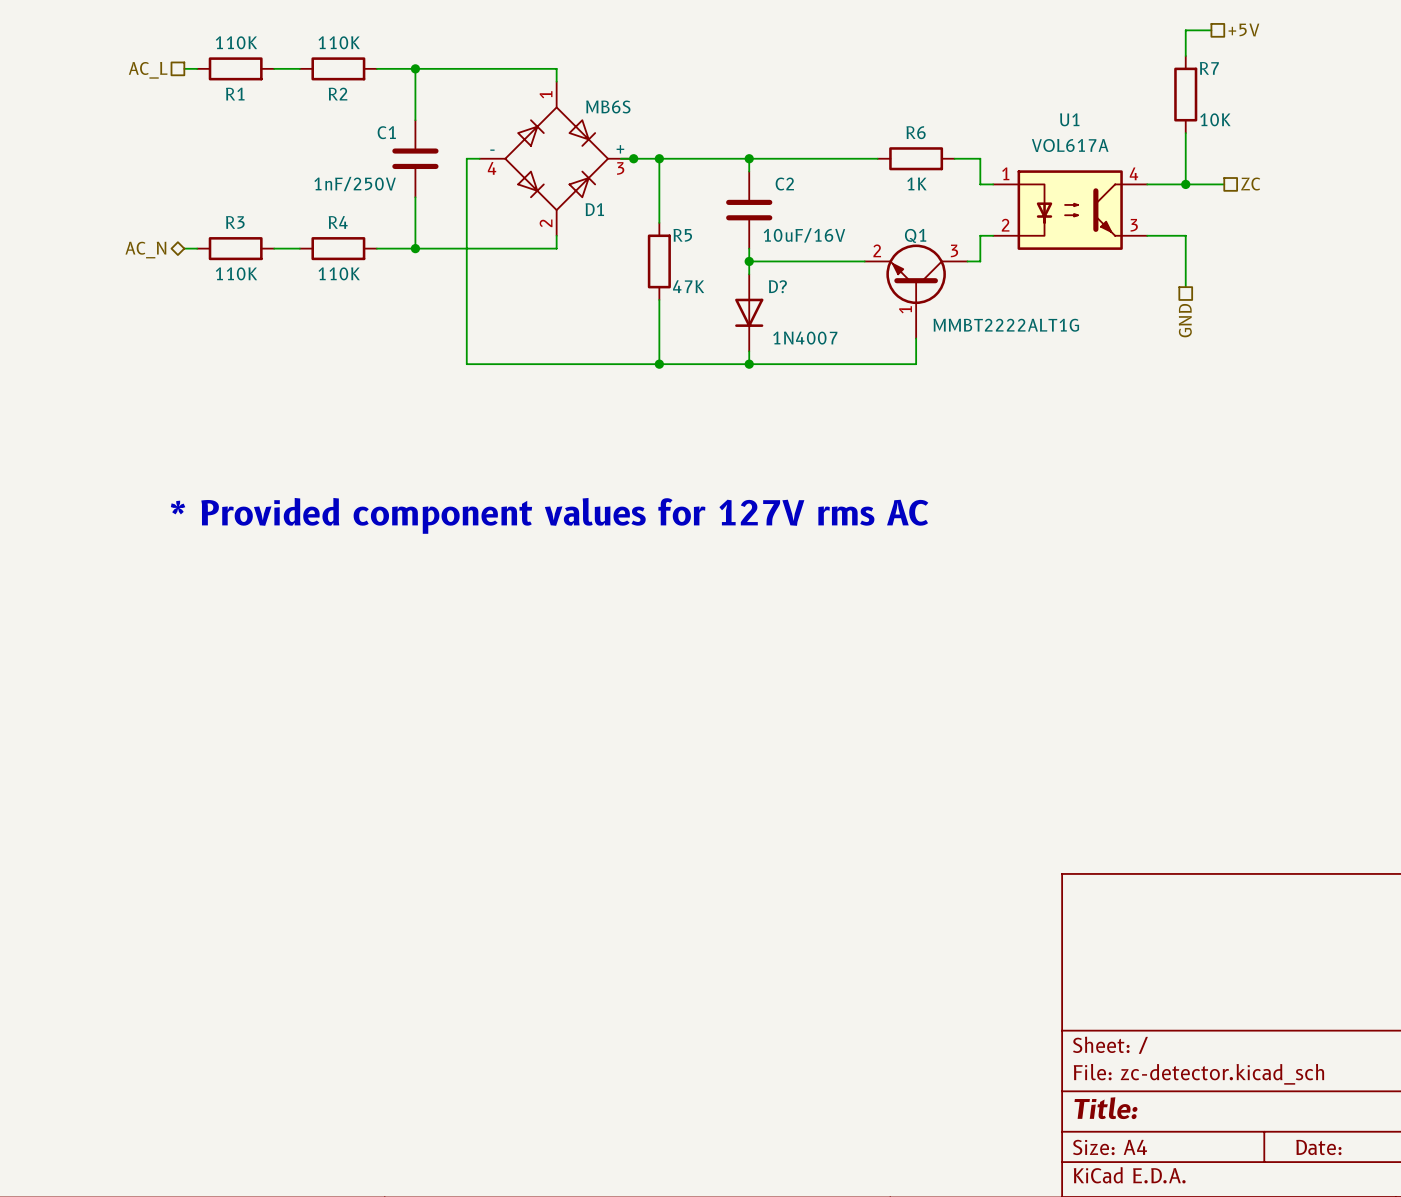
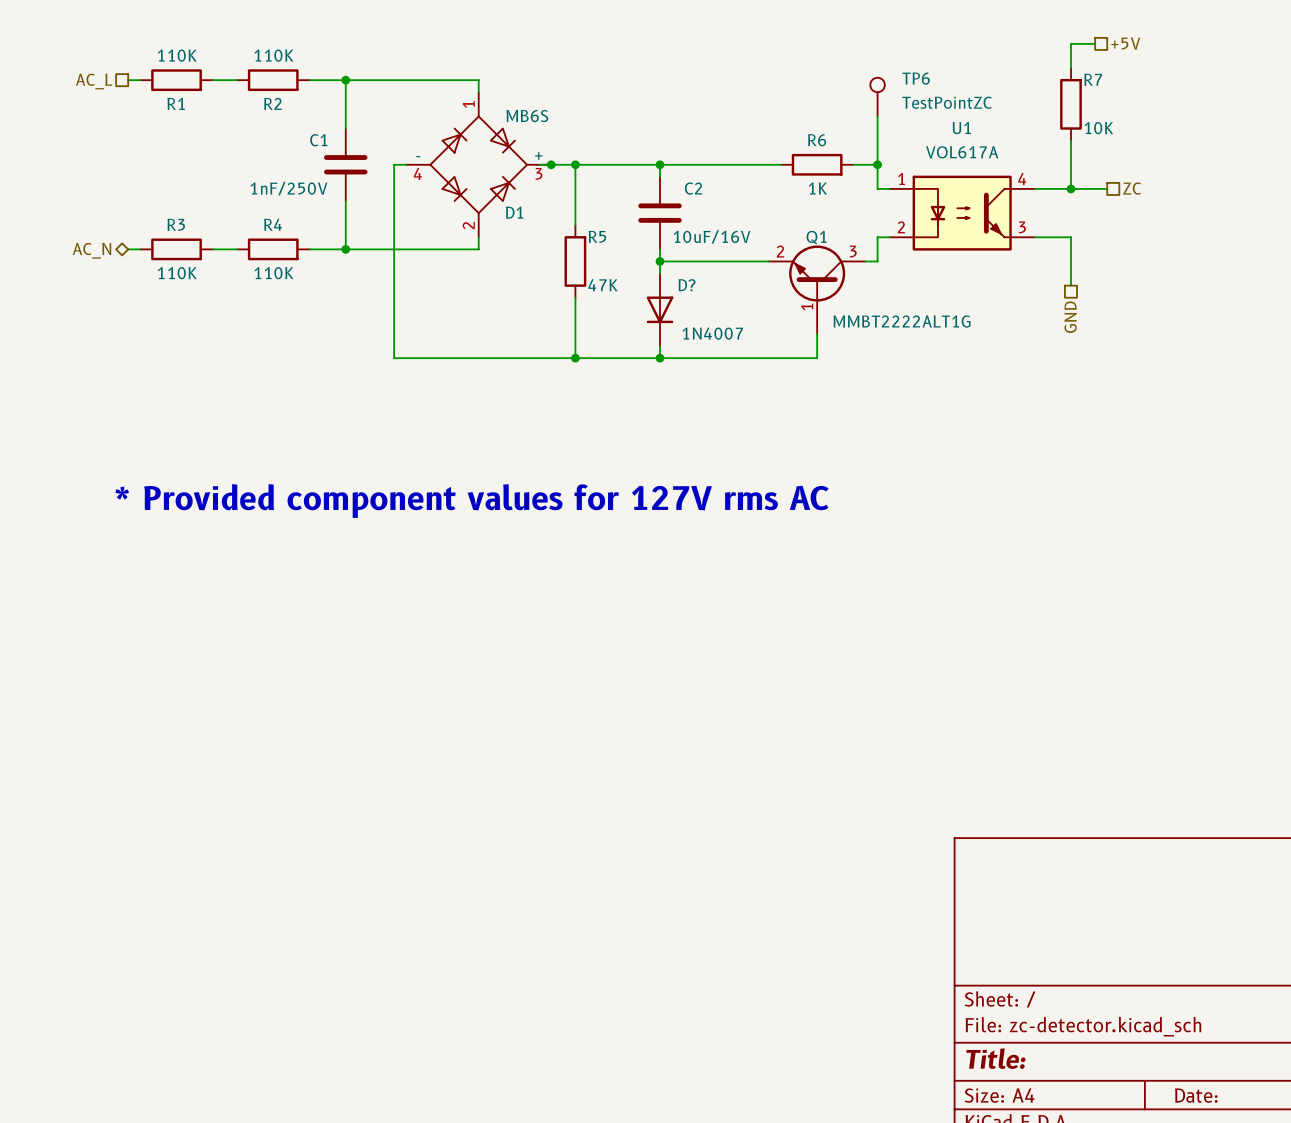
TP6: none -> TestPointZC (877, 97)
wire: none -> (877, 116) (877, 164)
junction: none -> (877, 164)

